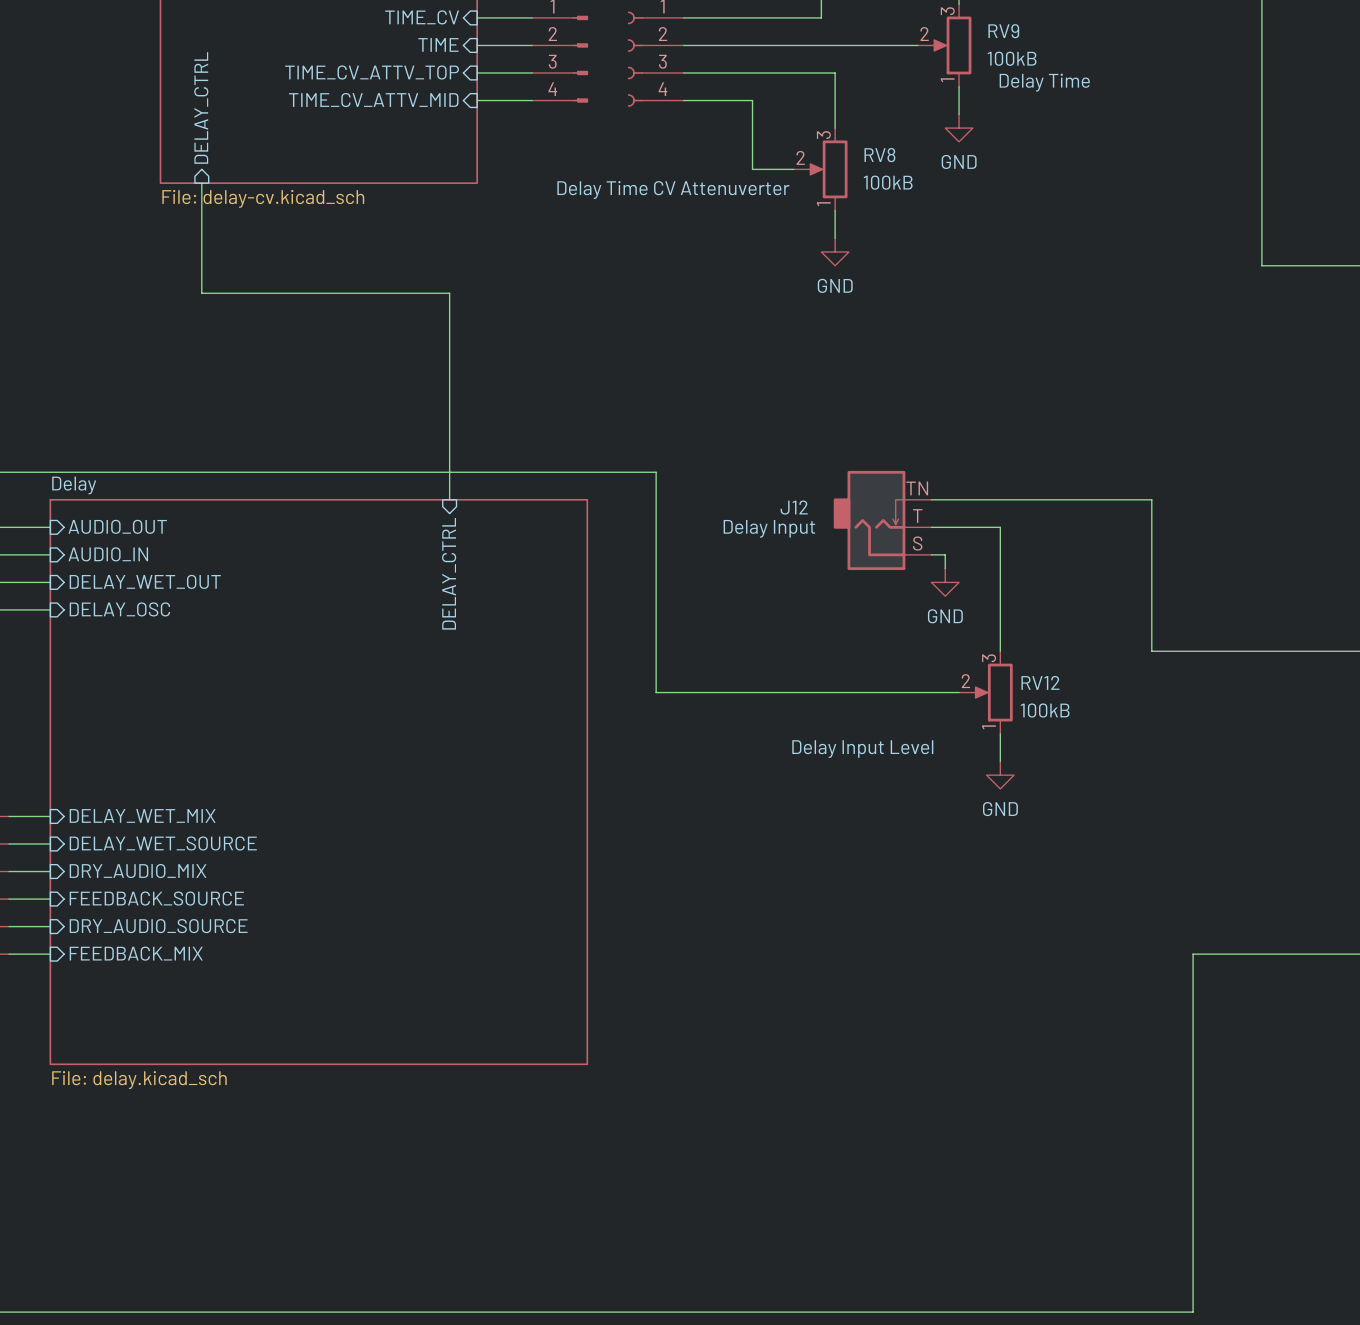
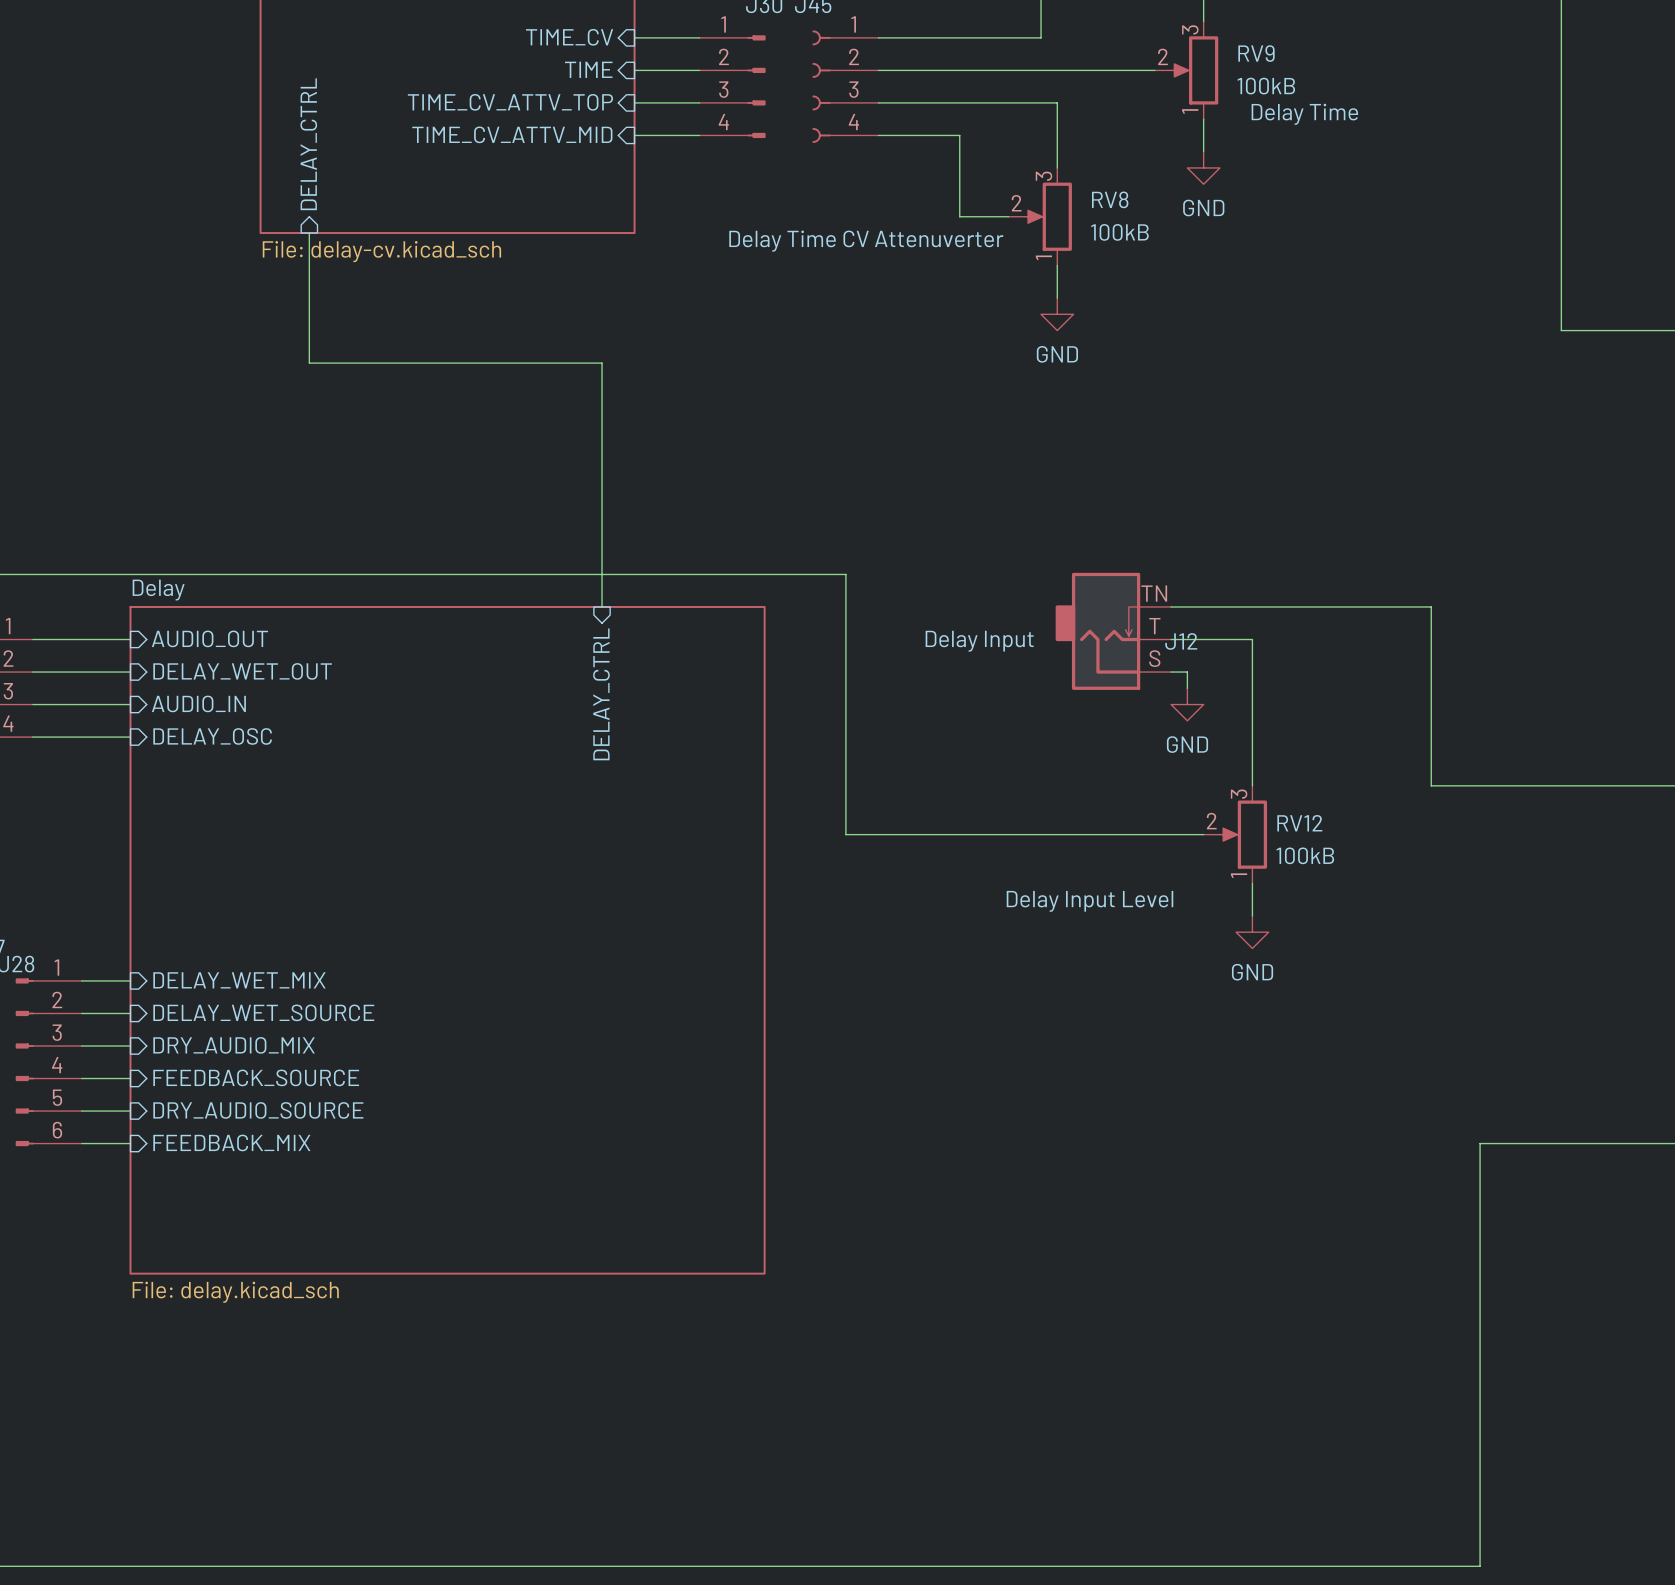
J12 name position: J12 (794, 507) -> J12 (1181, 641)
sheet pin: AUDIO_IN (108, 554) -> DELAY_WET_OUT (242, 671)
sheet pin: DELAY_WET_OUT (145, 581) -> AUDIO_IN (198, 703)

